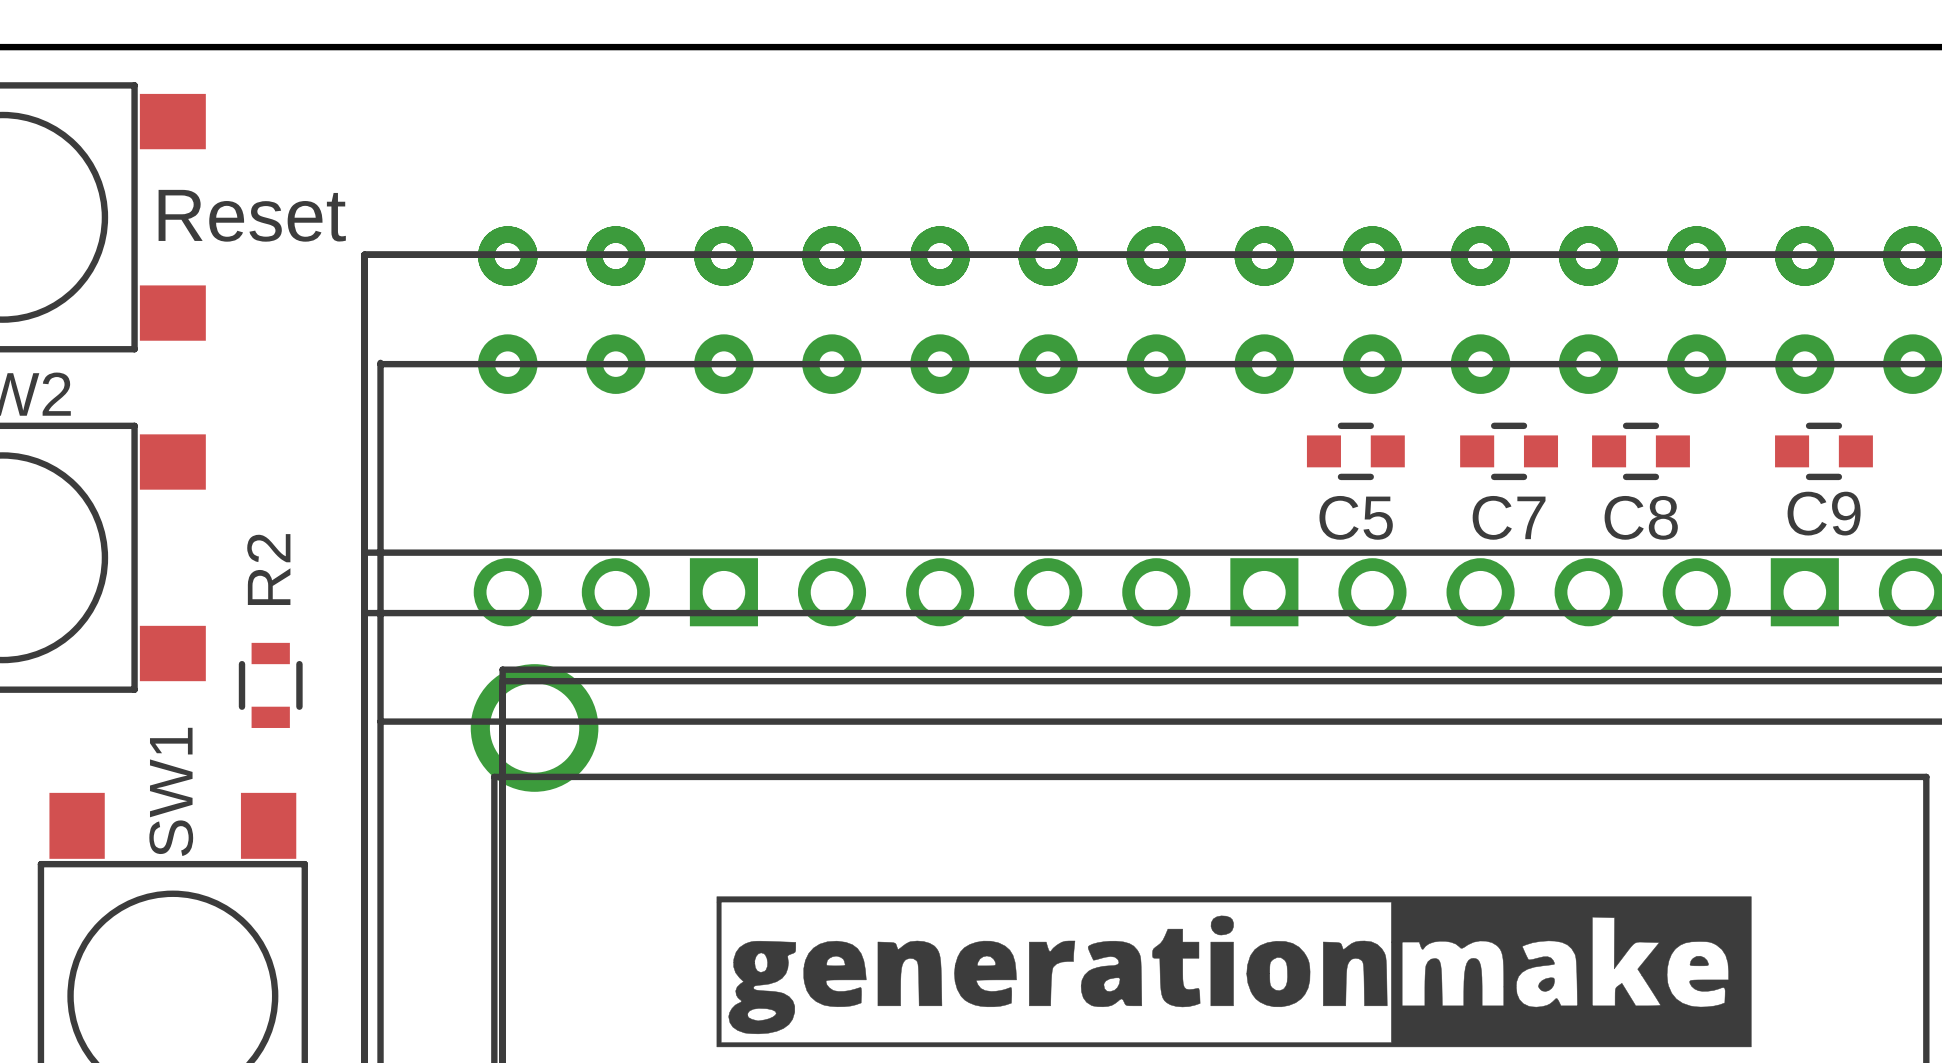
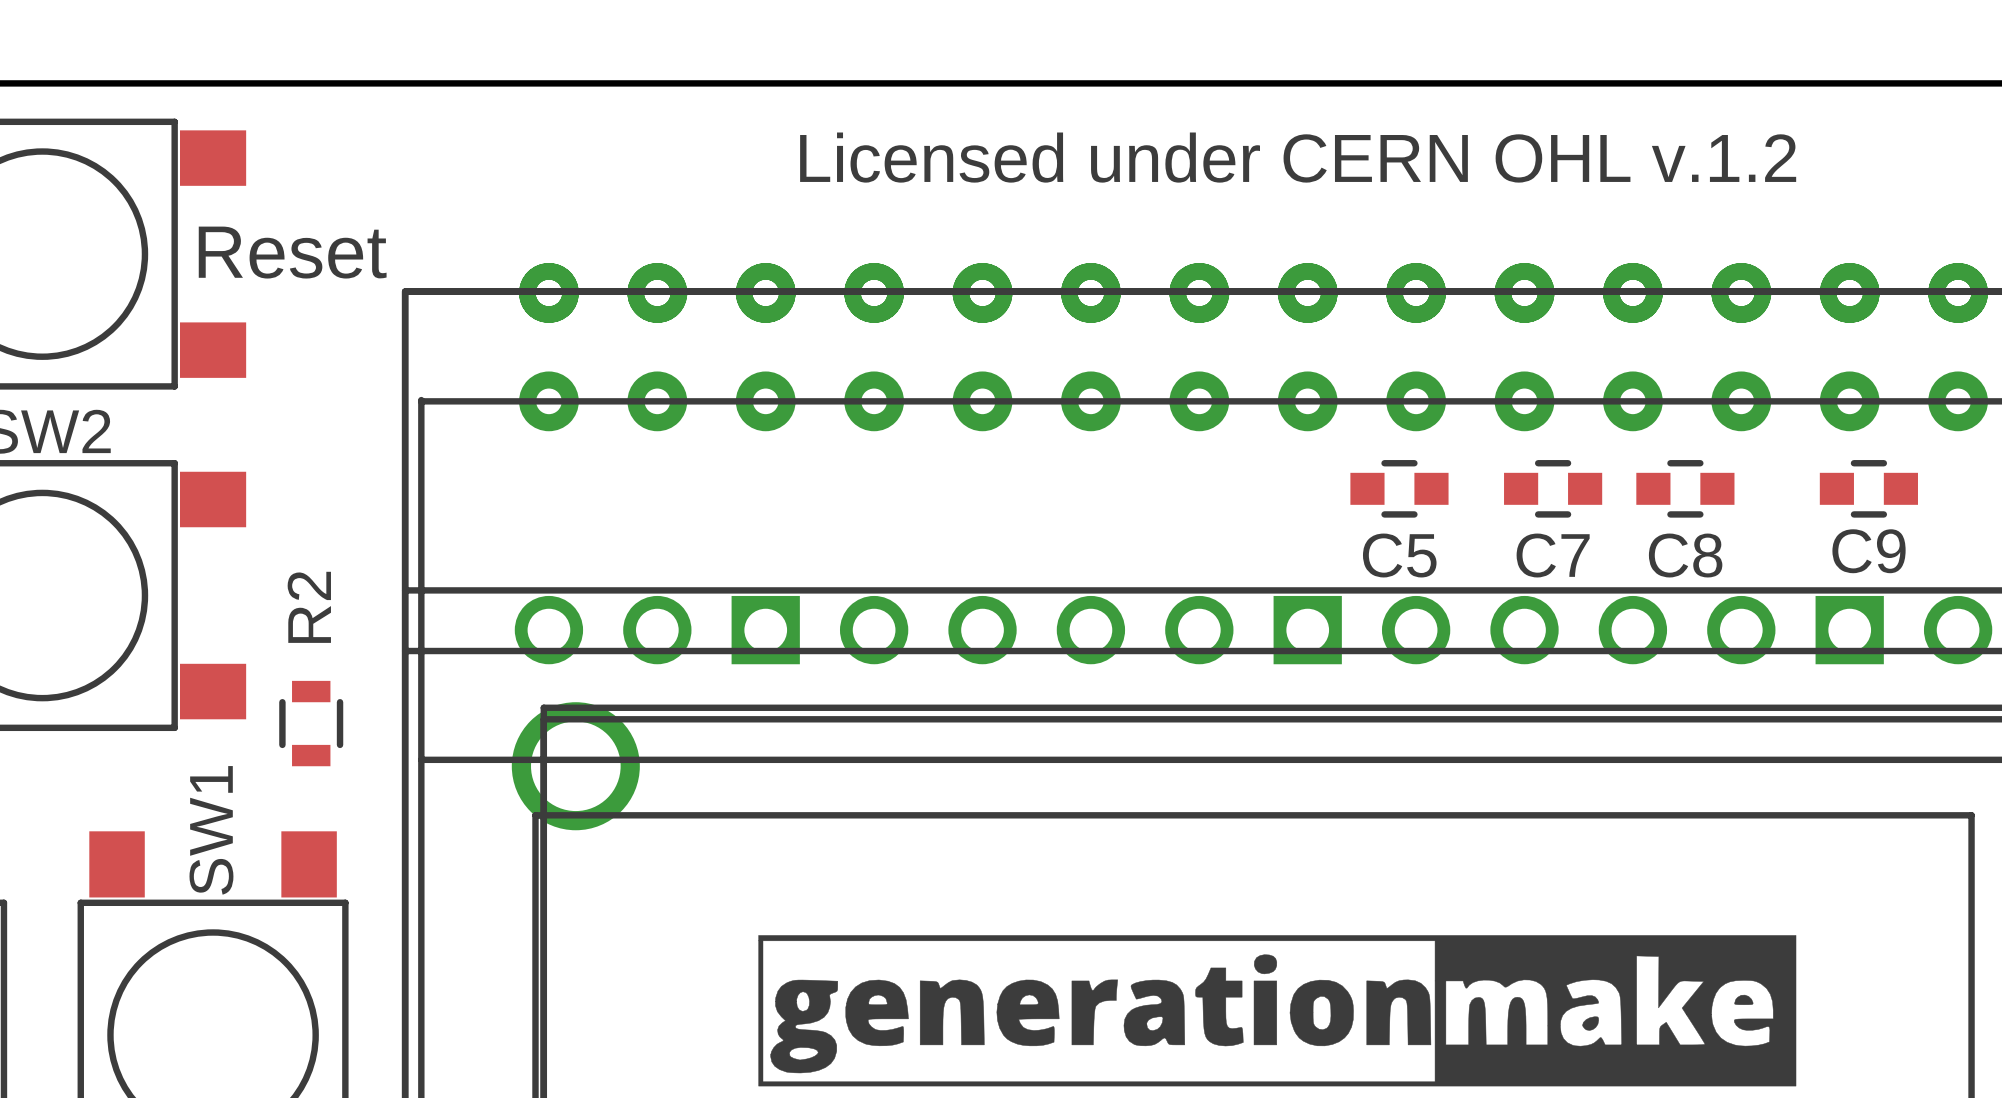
text: none -> Licensed under CERN OHL v.1.2 (1298, 157)

